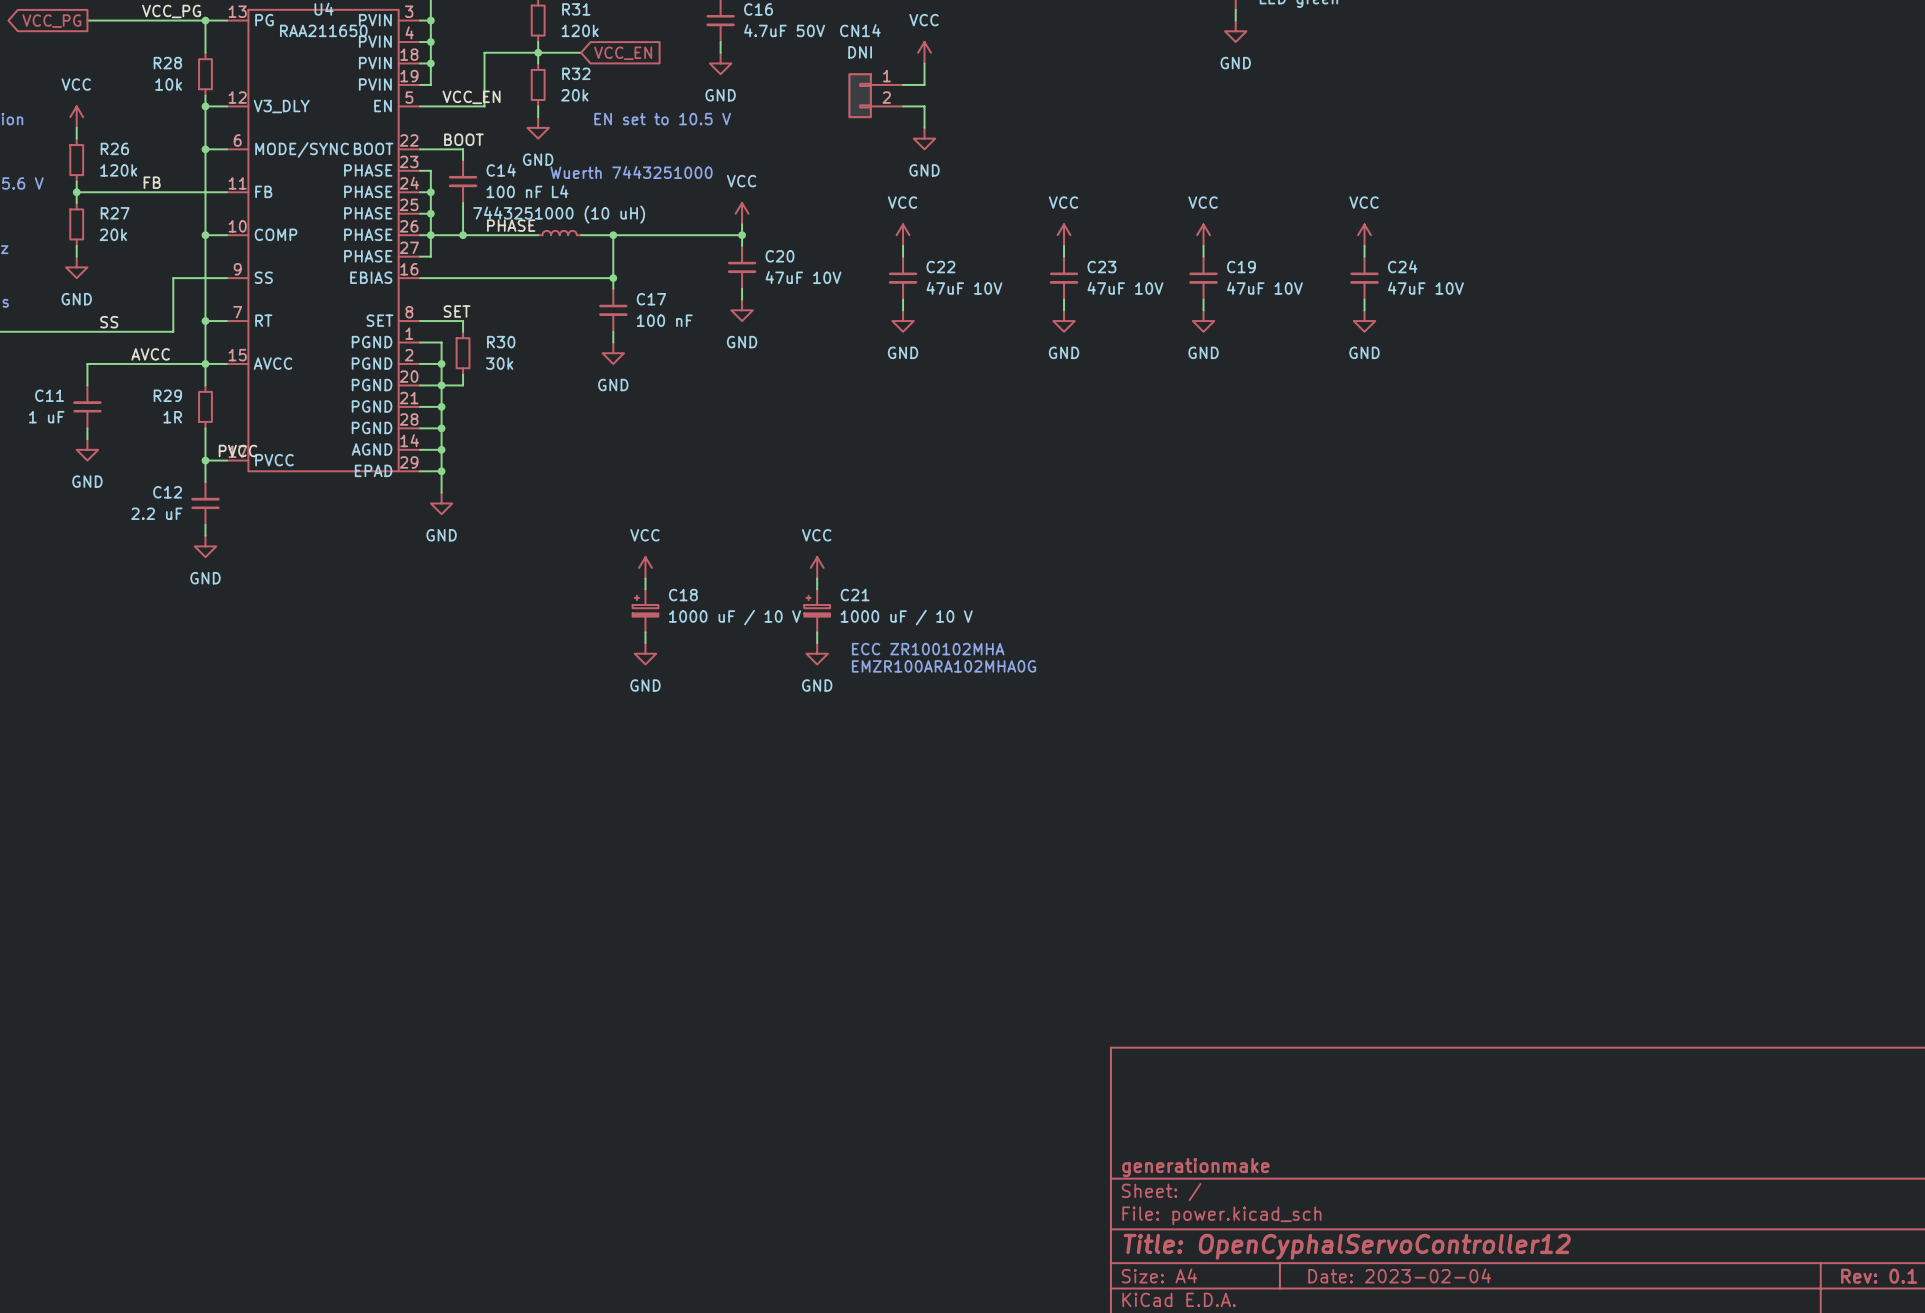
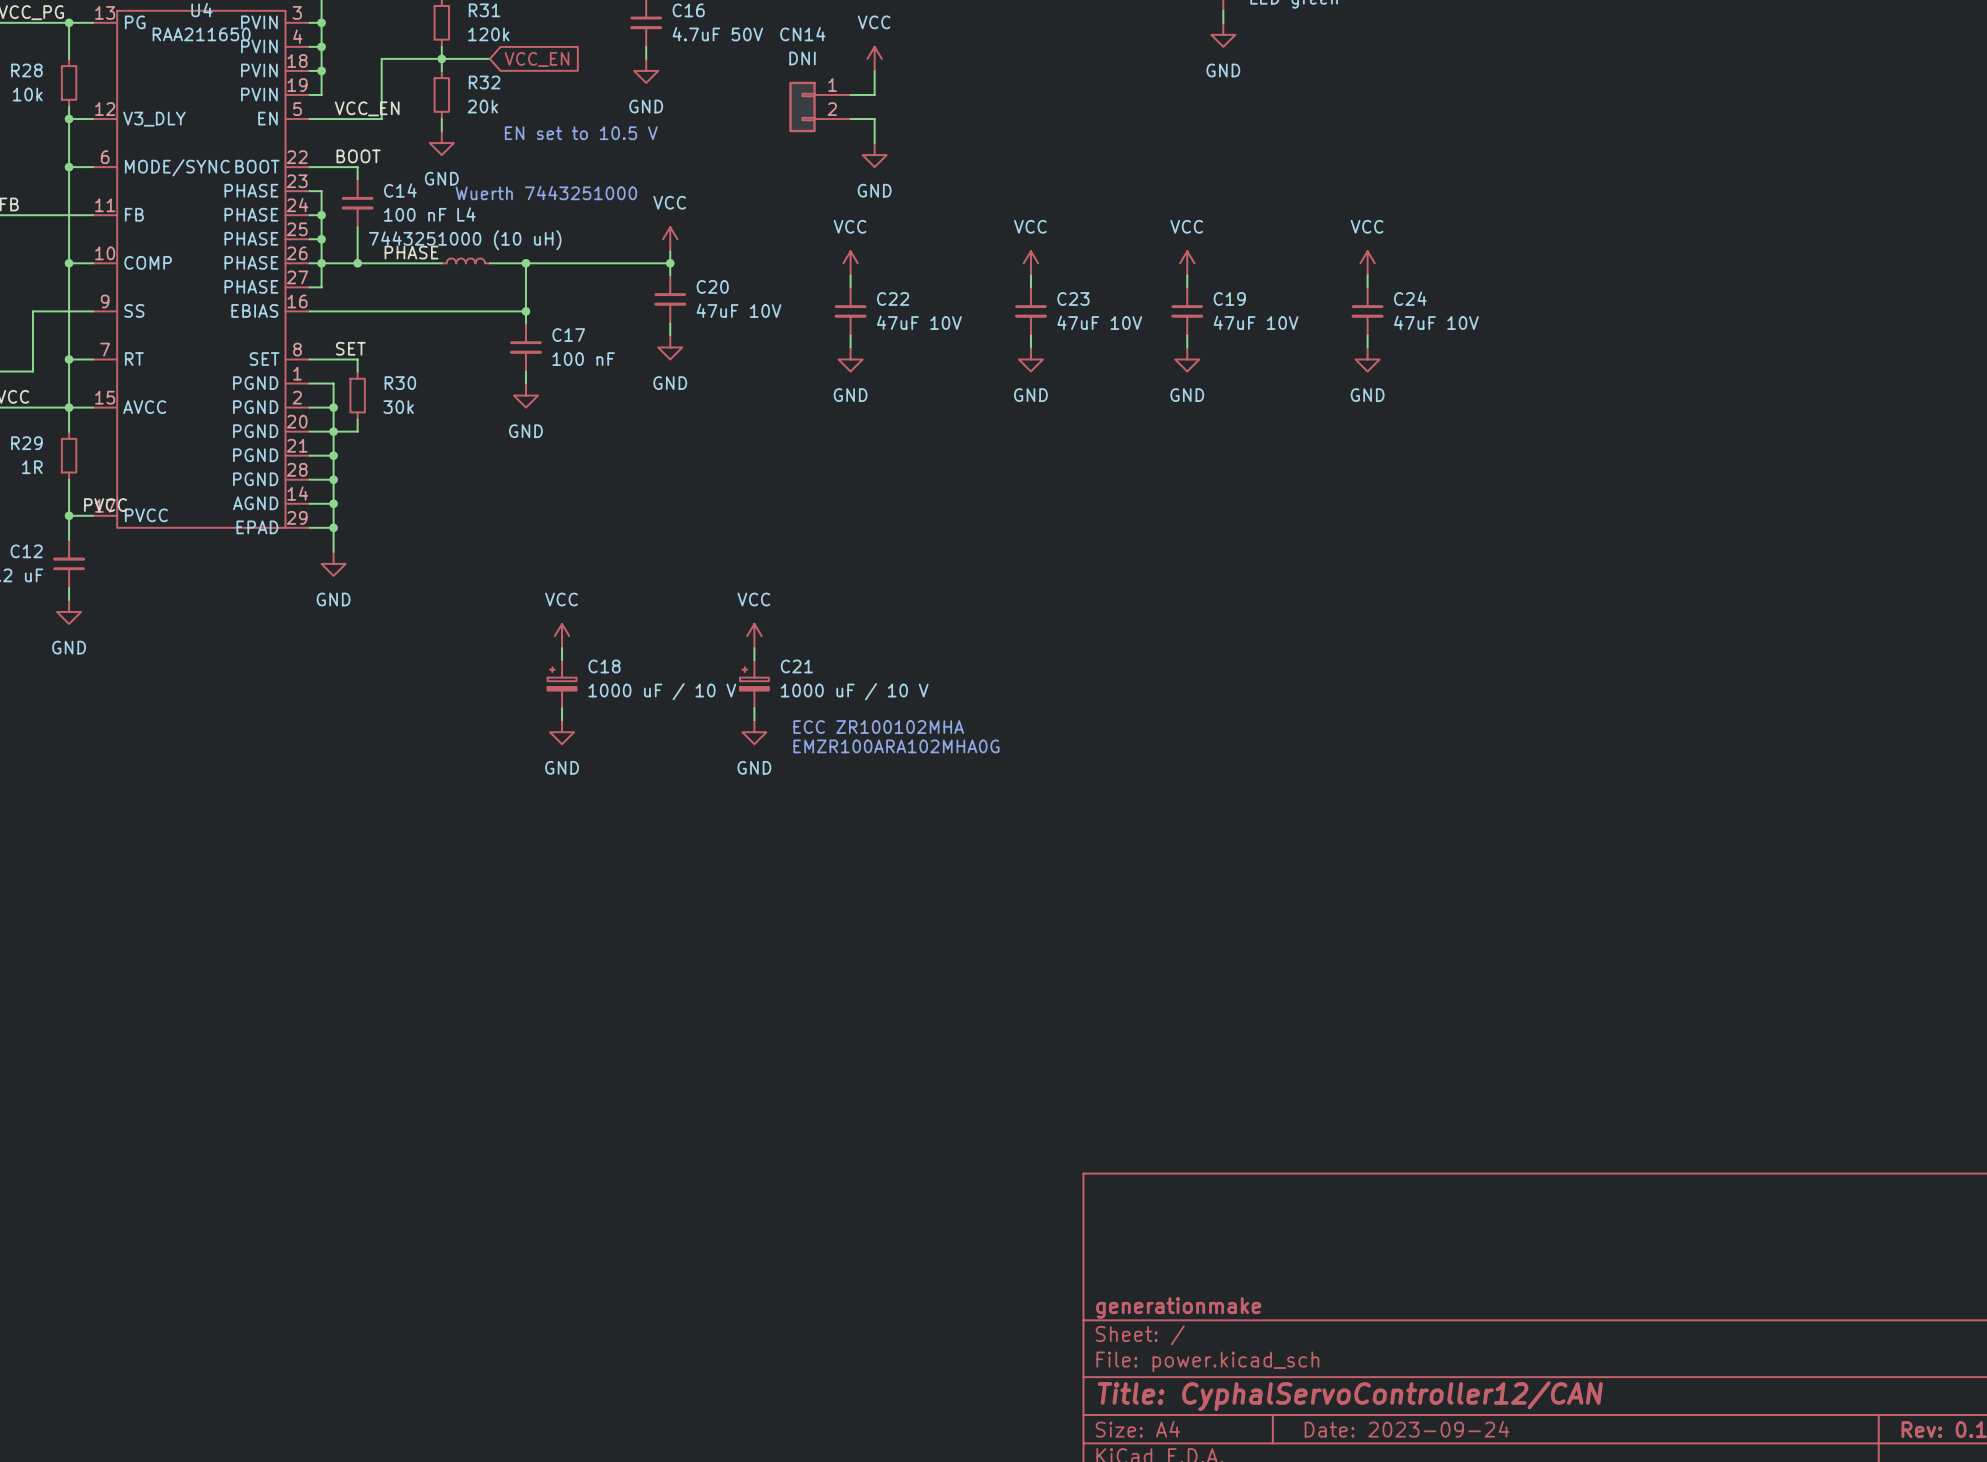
title block: Title: OpenCyphalServoController12 (1347, 1246) -> Title: CyphalServoController12/CAN (1350, 1396)
title block: Date: 2023-02-04 (1399, 1275) -> Date: 2023-09-24 (1407, 1429)

